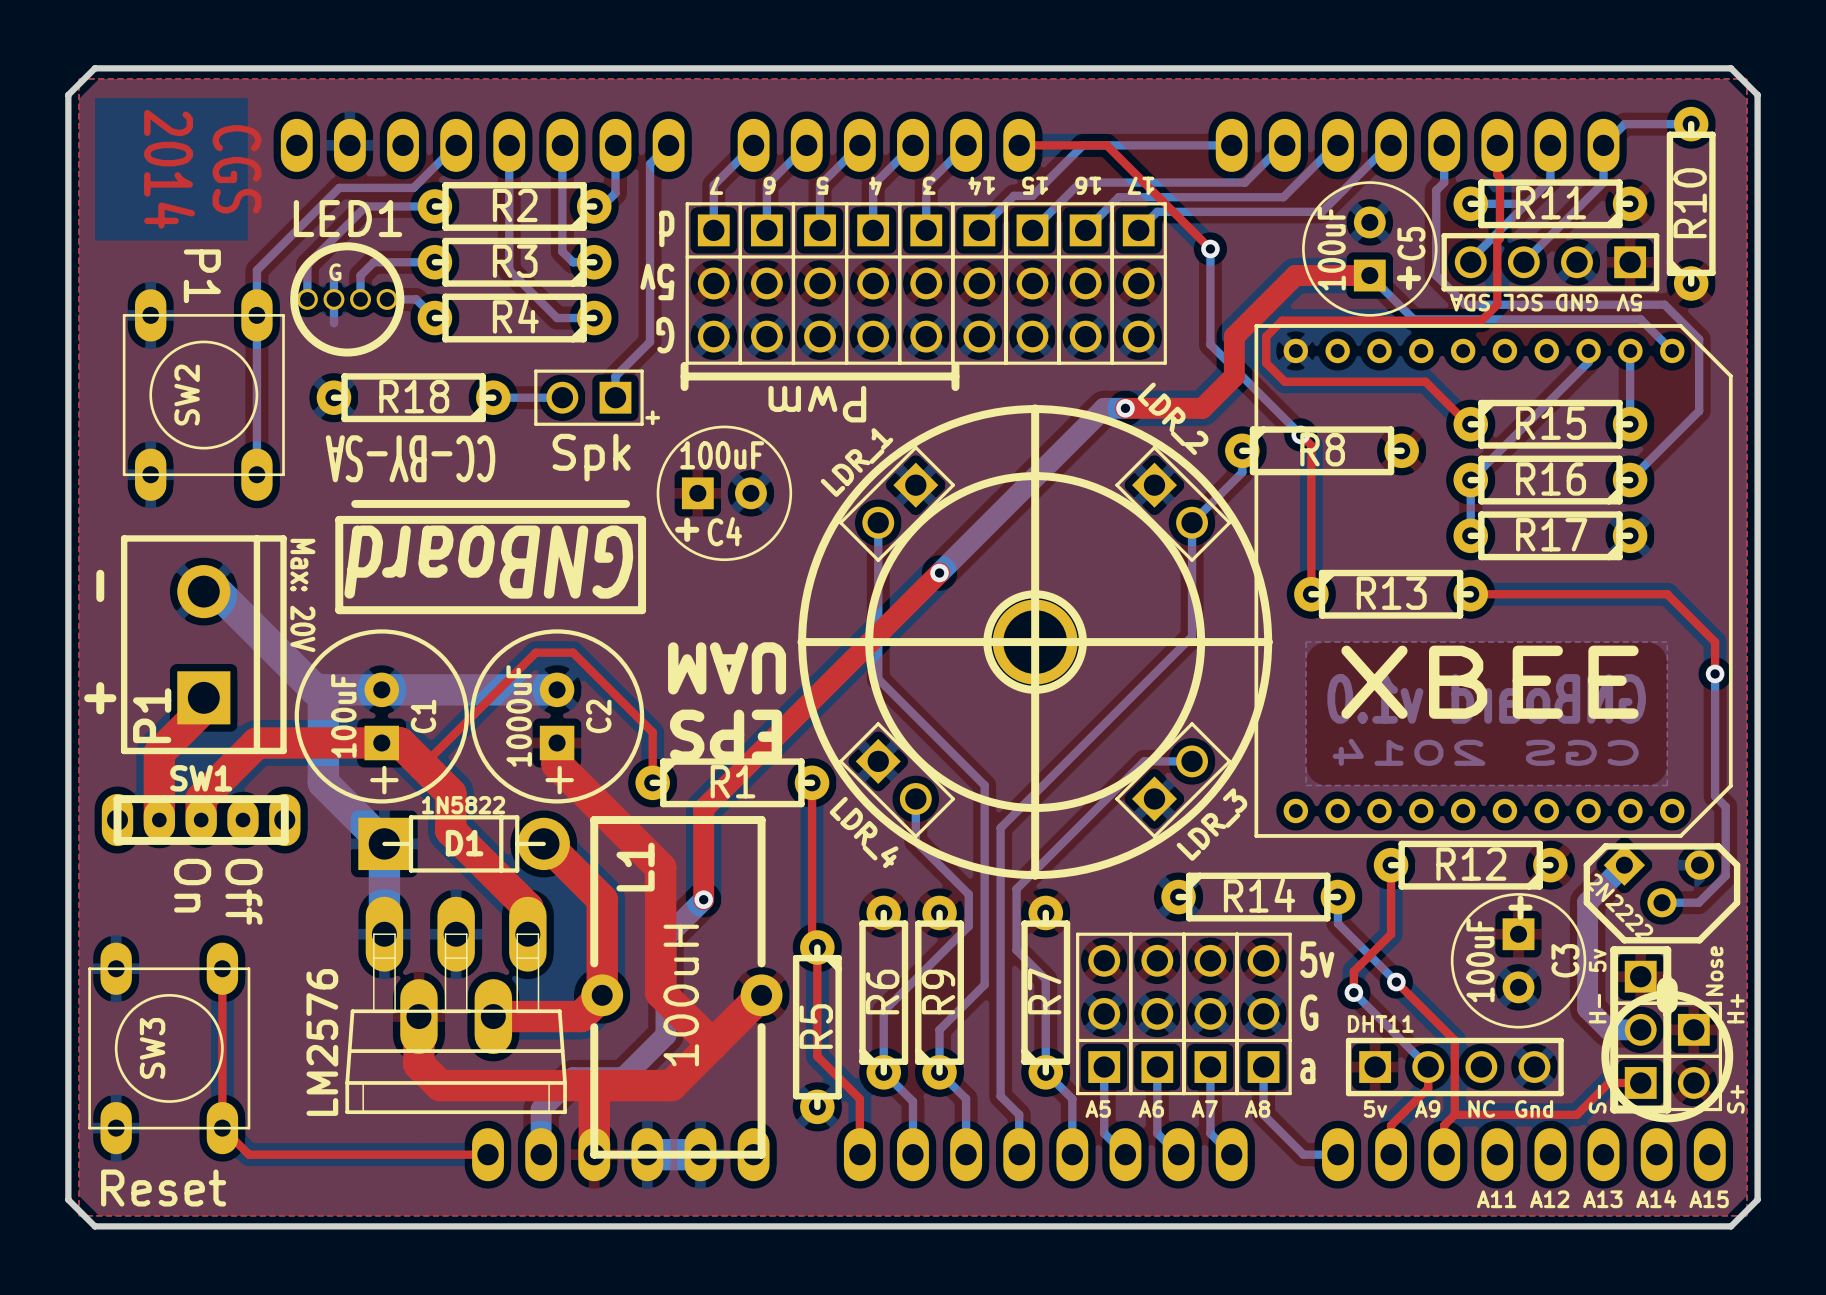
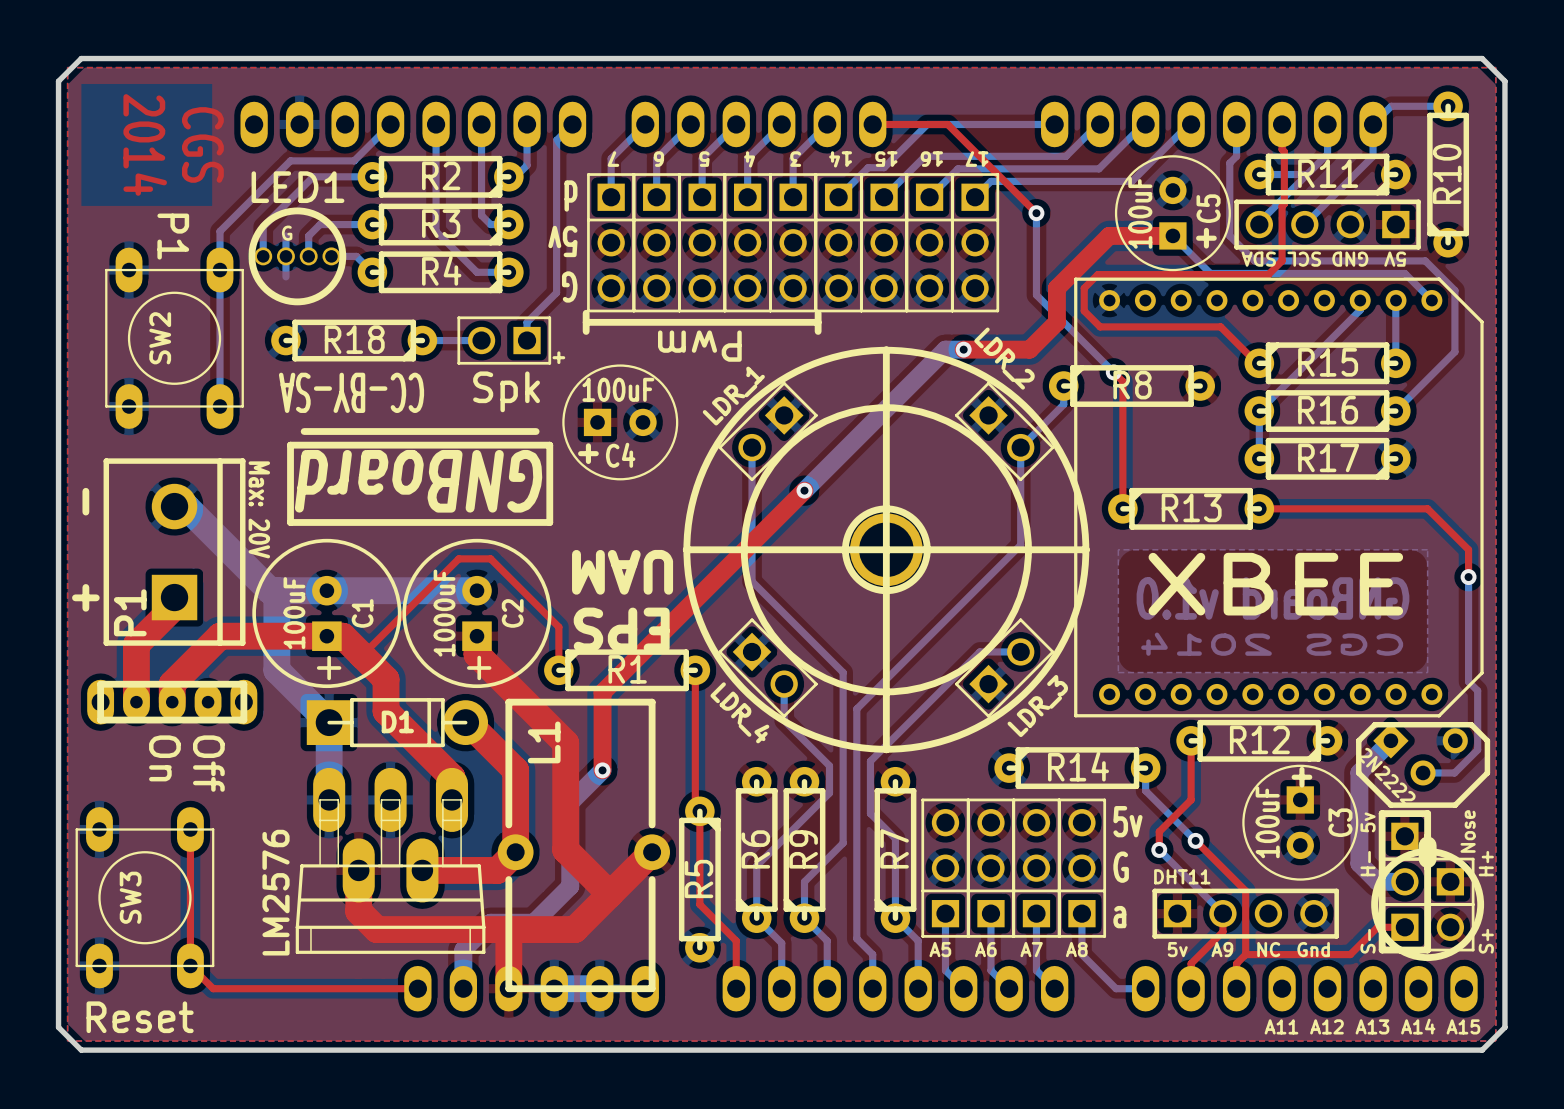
SW1 name: SW1 (201, 778) -> none
D1 value: 1N5822 (463, 805) -> none
L1 value: 100uH (681, 995) -> none

